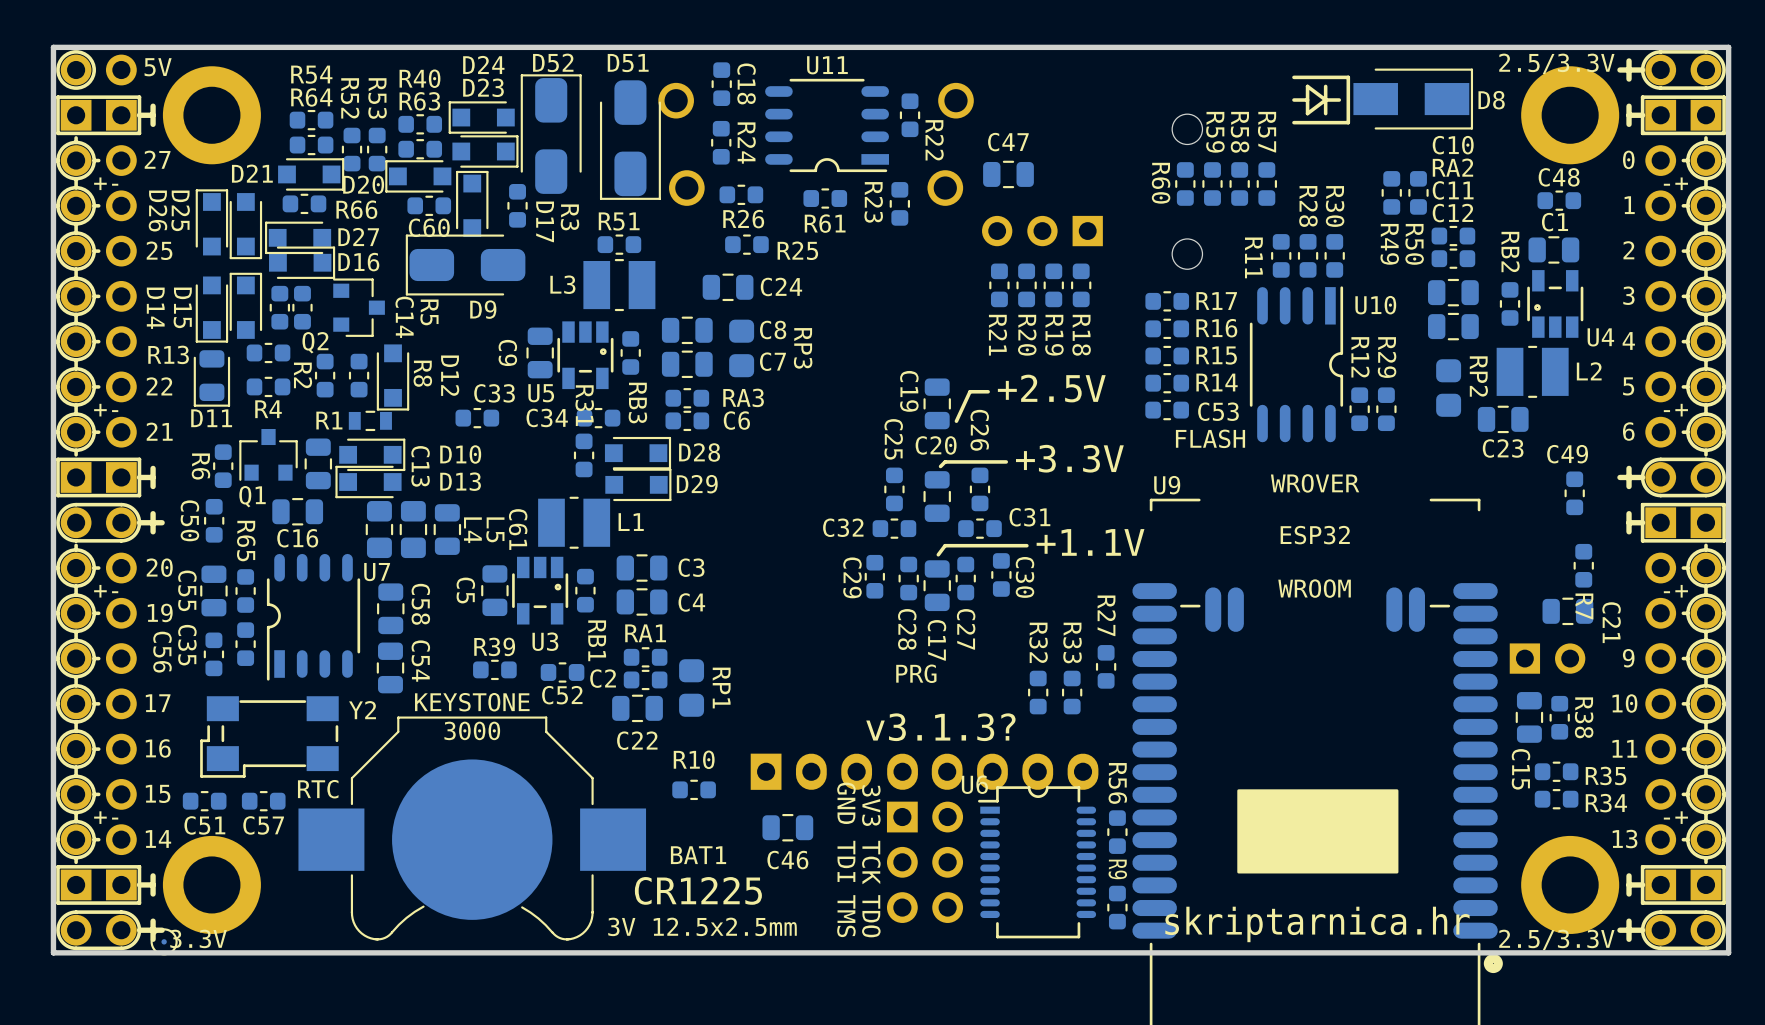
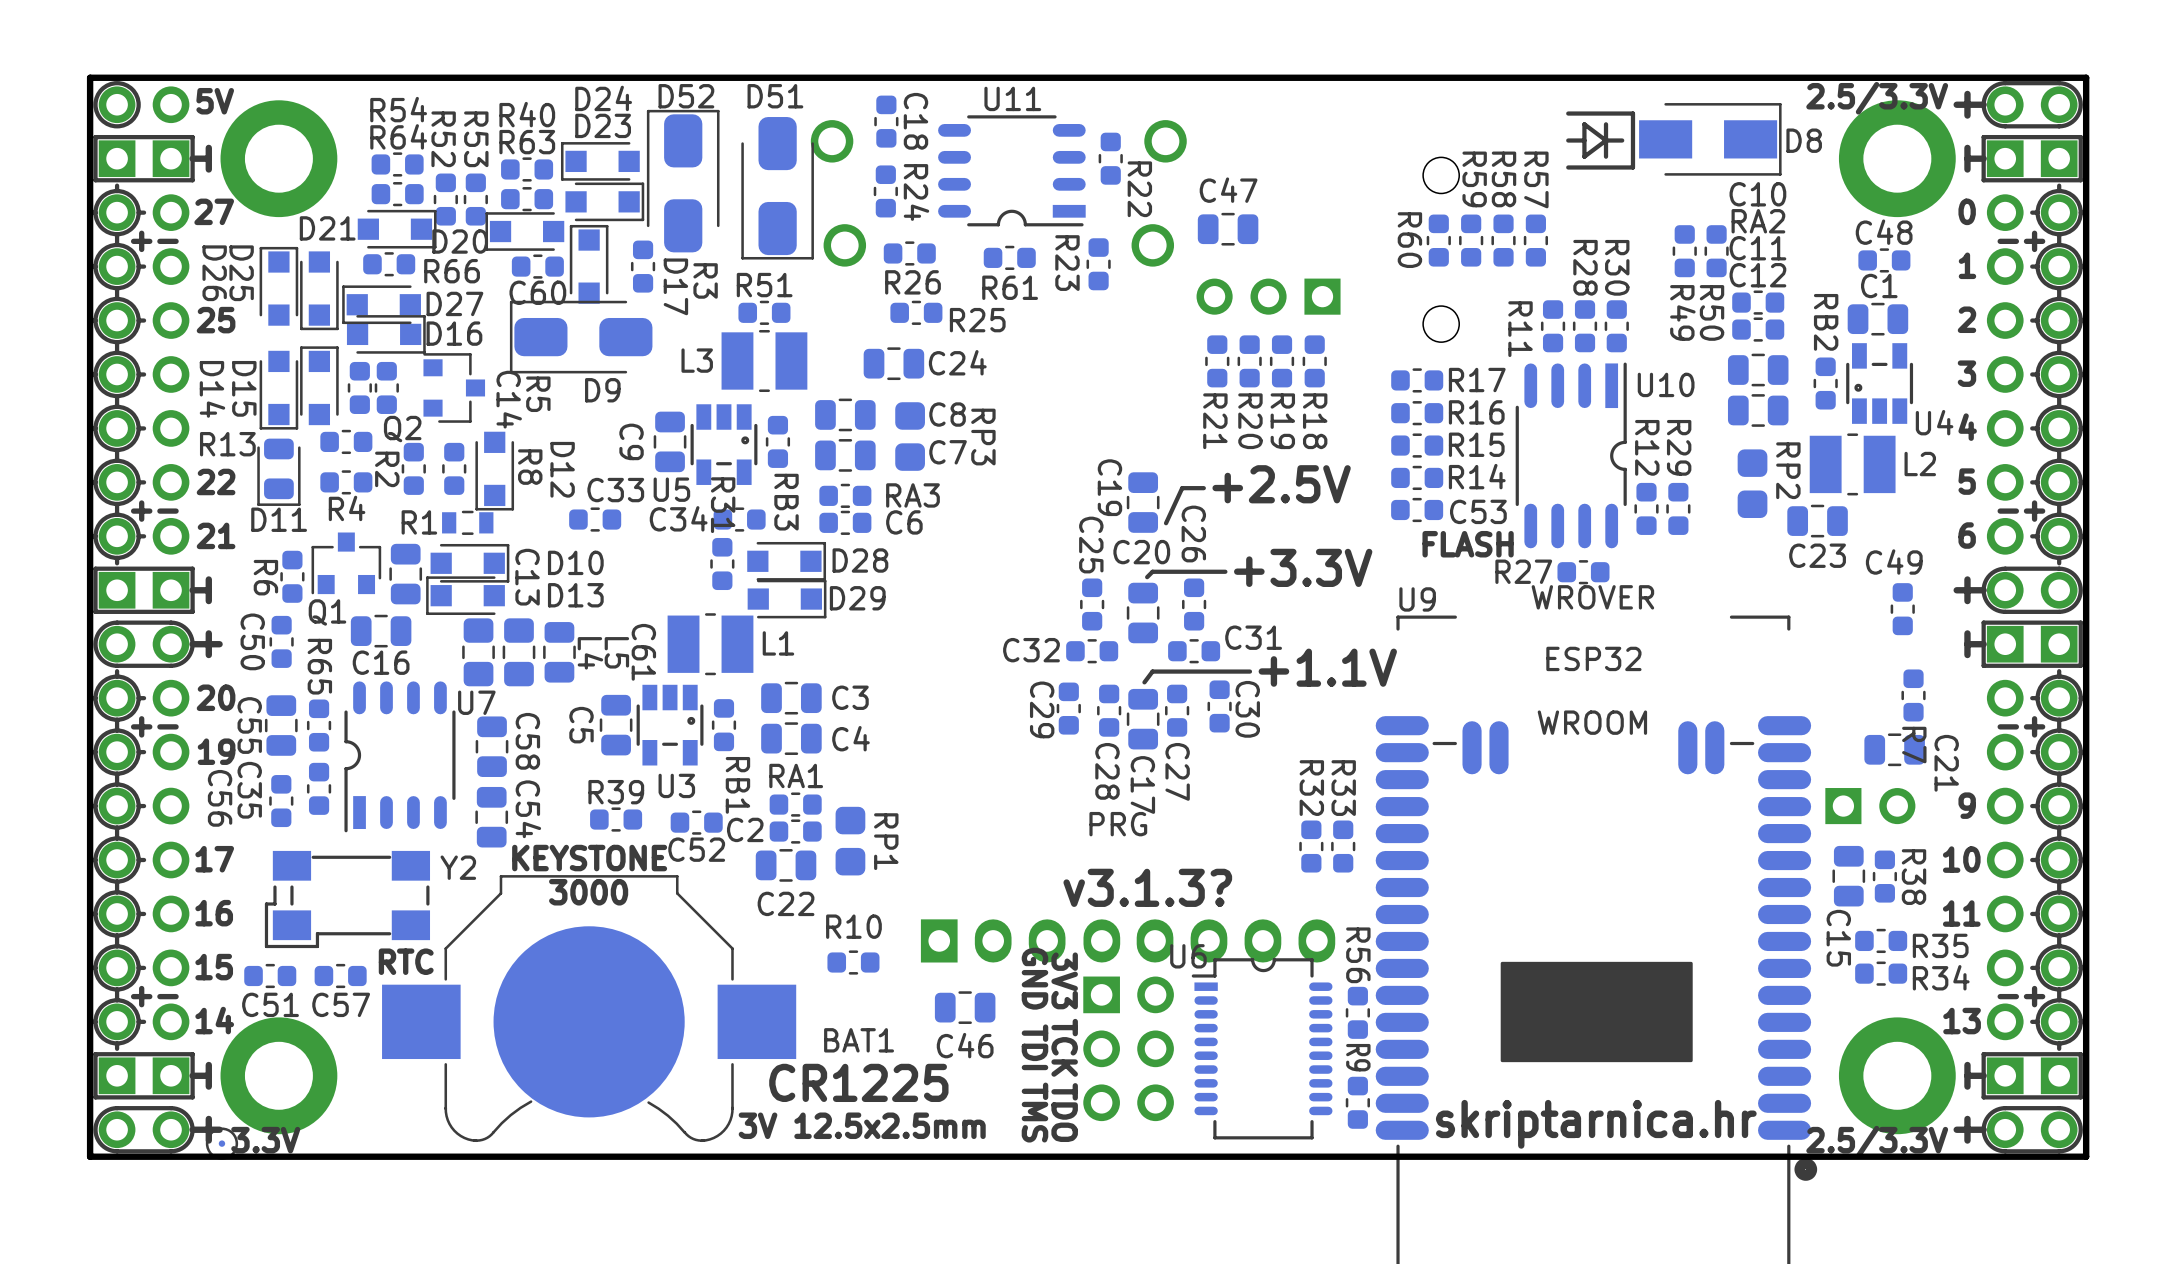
R27 name position: R27 (1106, 615) -> R27 (1523, 571)
R27 rotation: 0° (1106, 666) -> 90° clockwise (1583, 572)
R27 position: (1106, 666) -> (1583, 572)
R32 position: (1038, 692) -> (1311, 846)
R33 position: (1072, 692) -> (1343, 846)

